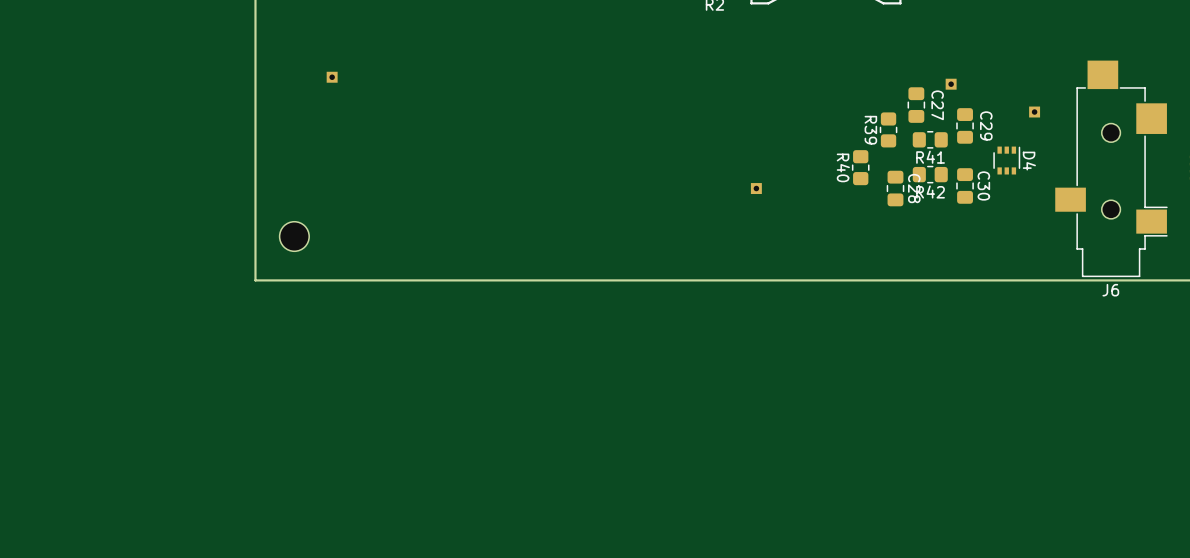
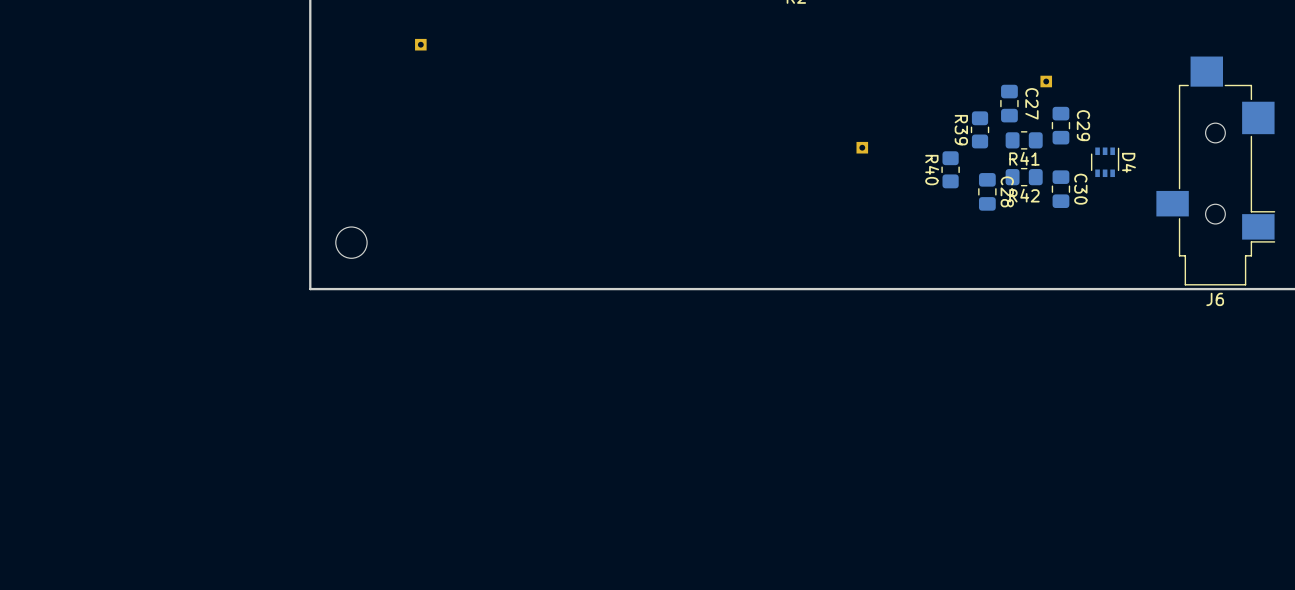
part position: (332, 77) -> (420, 44)
part: (1034, 112) -> none
part position: (756, 188) -> (862, 147)

